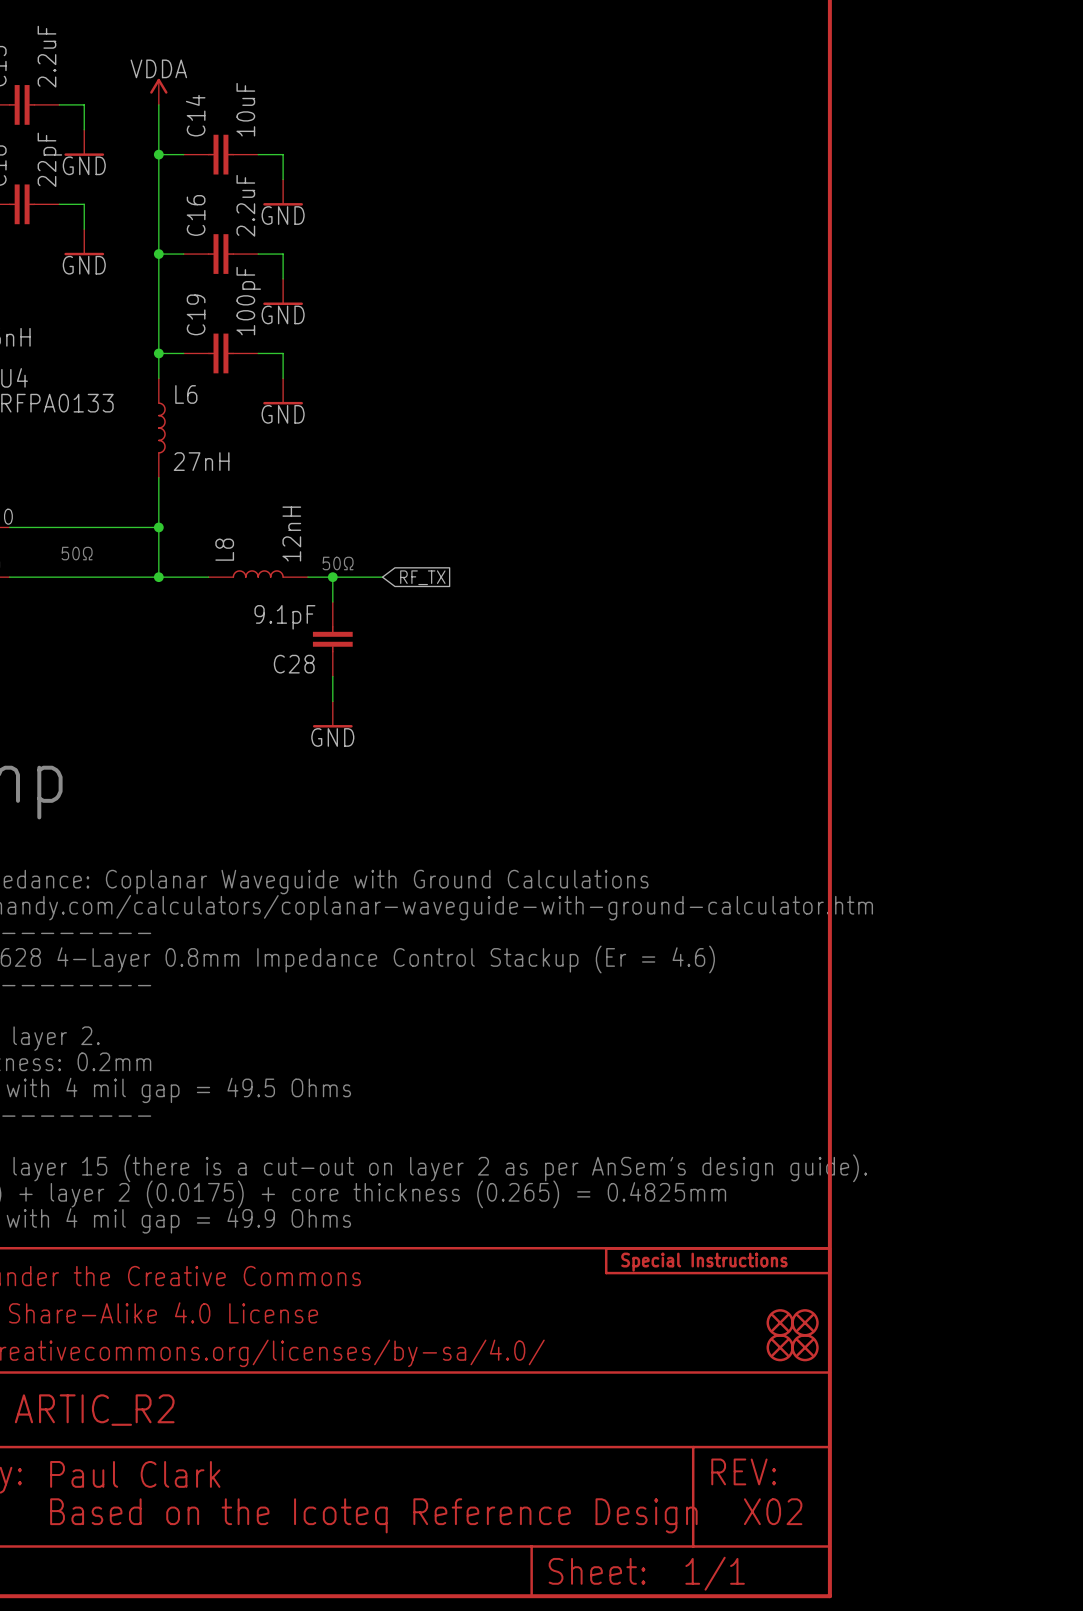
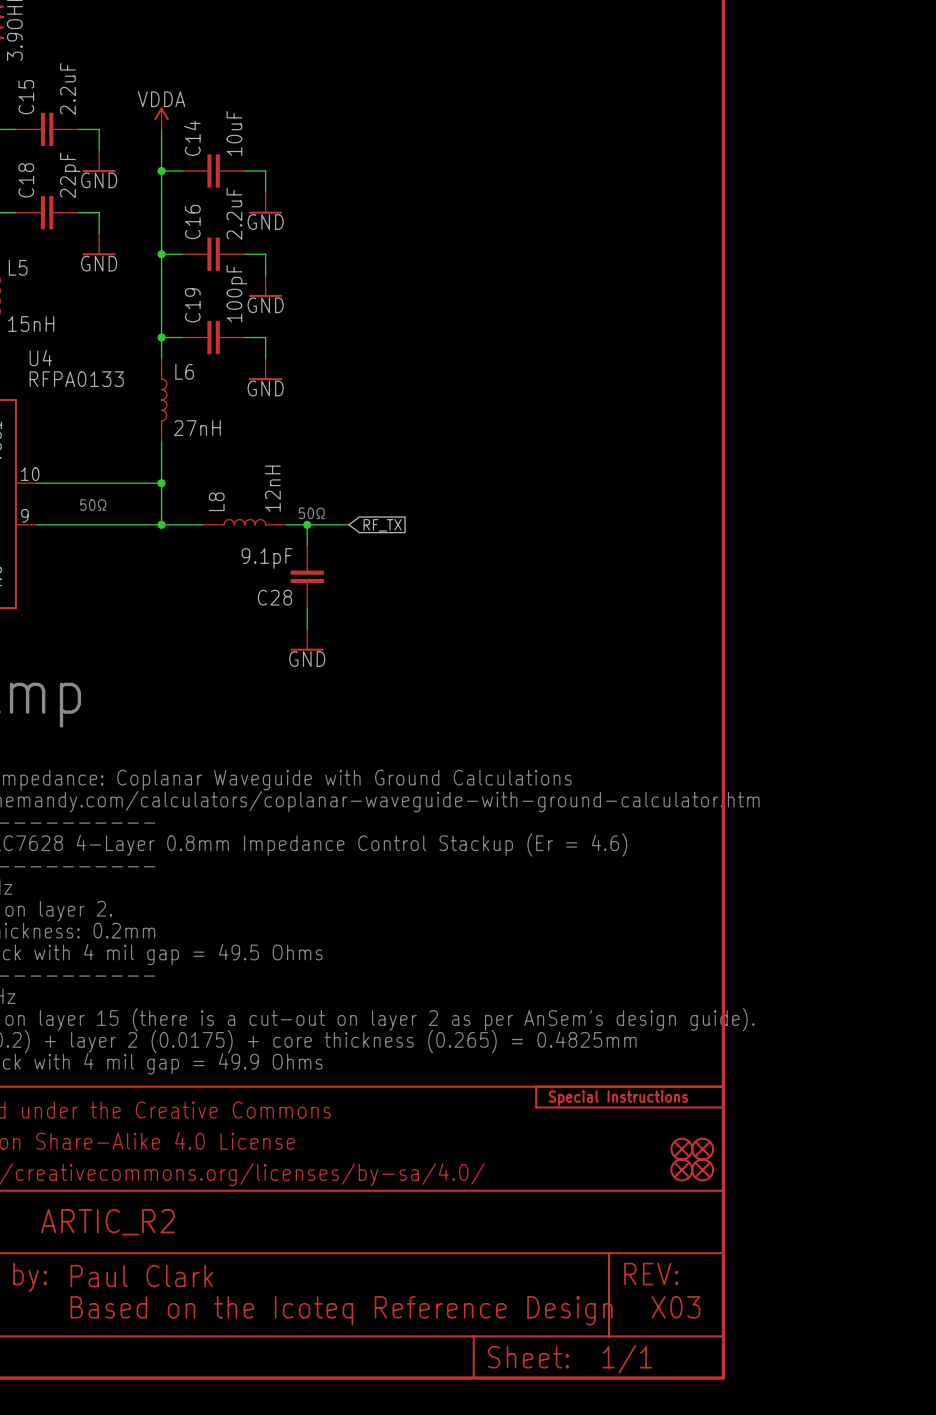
text: X02 (773, 1511) -> X03 (675, 1307)

